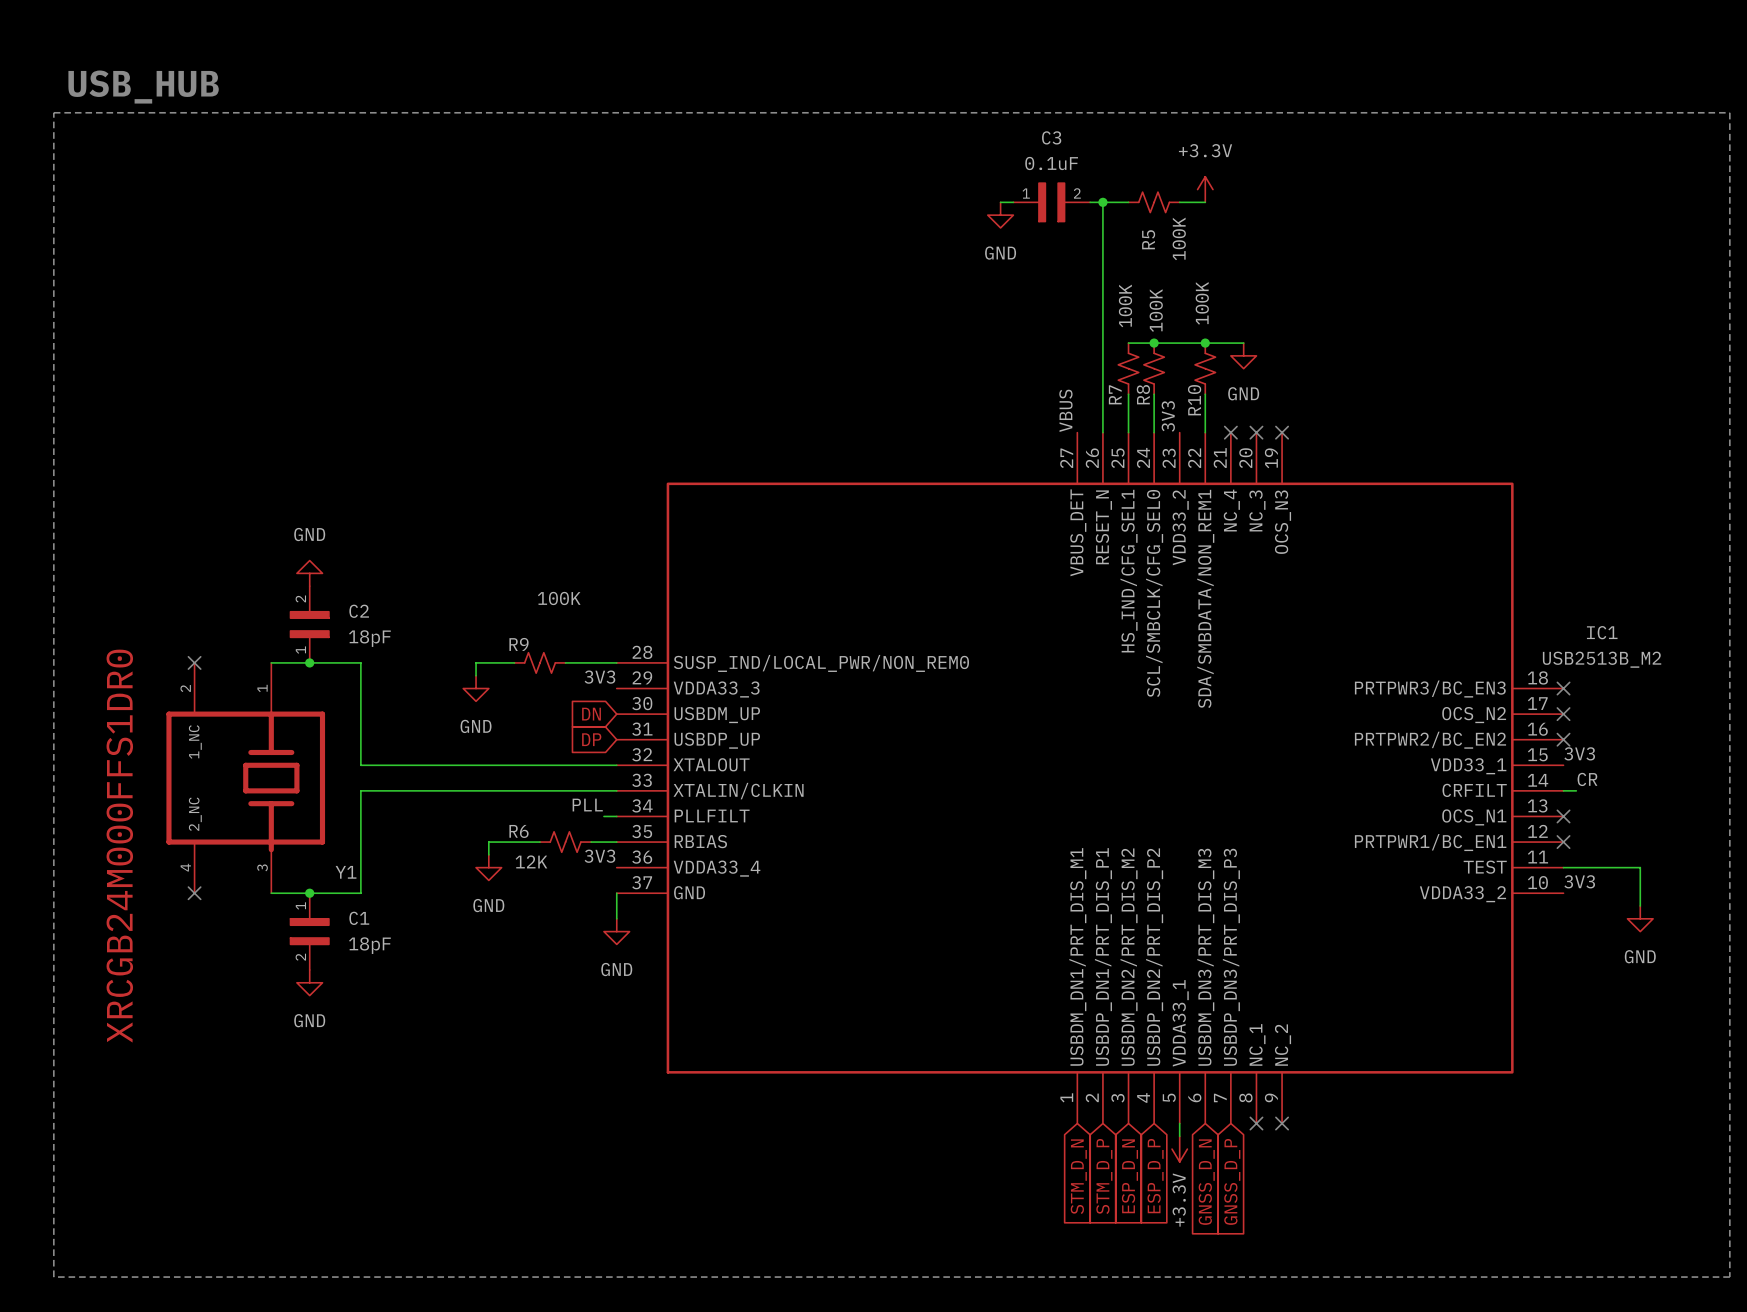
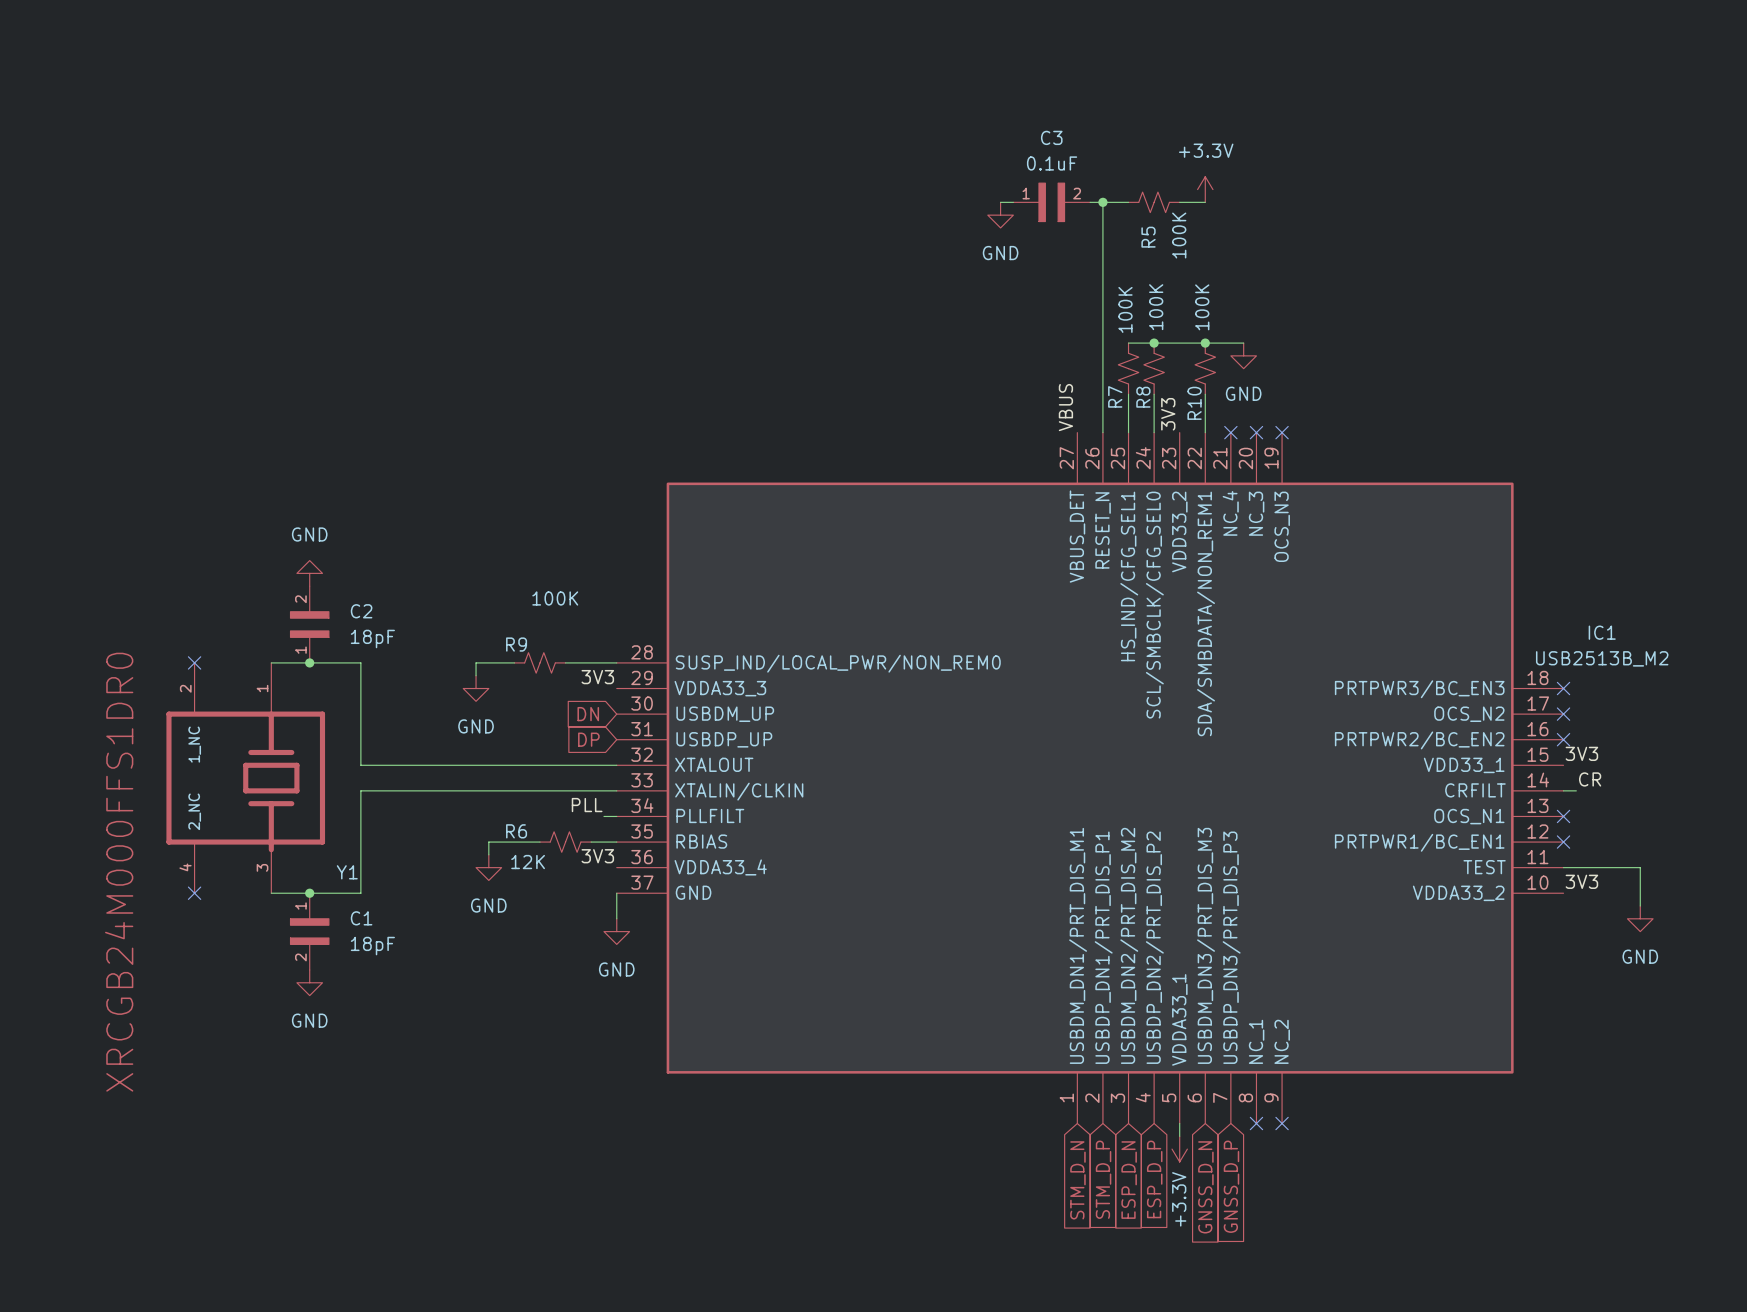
text: USB_HUB (143, 87) -> none
line: (53, 112) (1729, 112) (1729, 1277) (53, 1277) (53, 112) -> none

